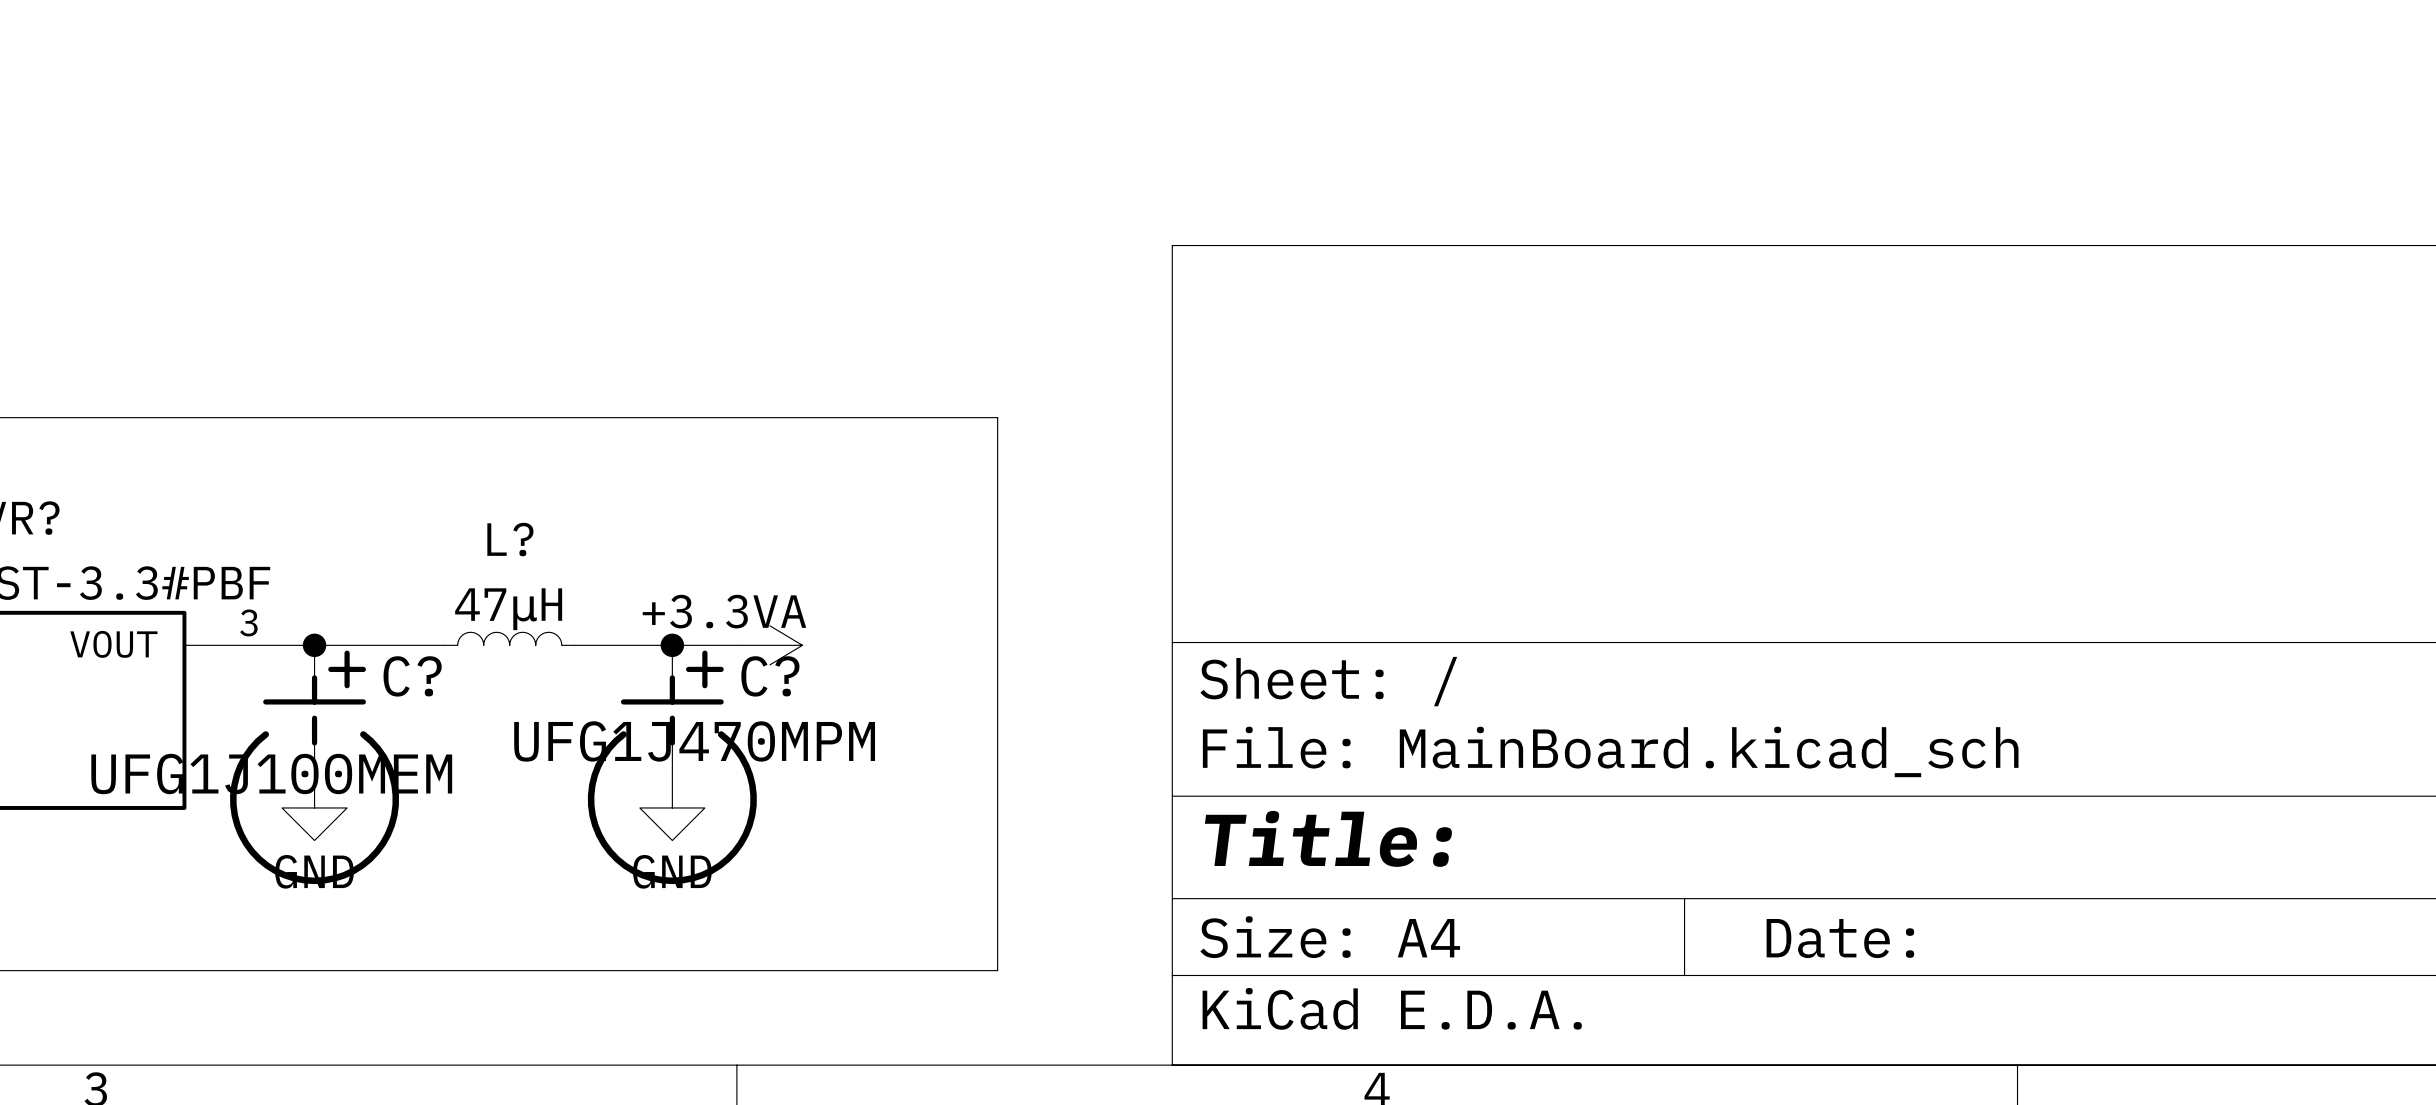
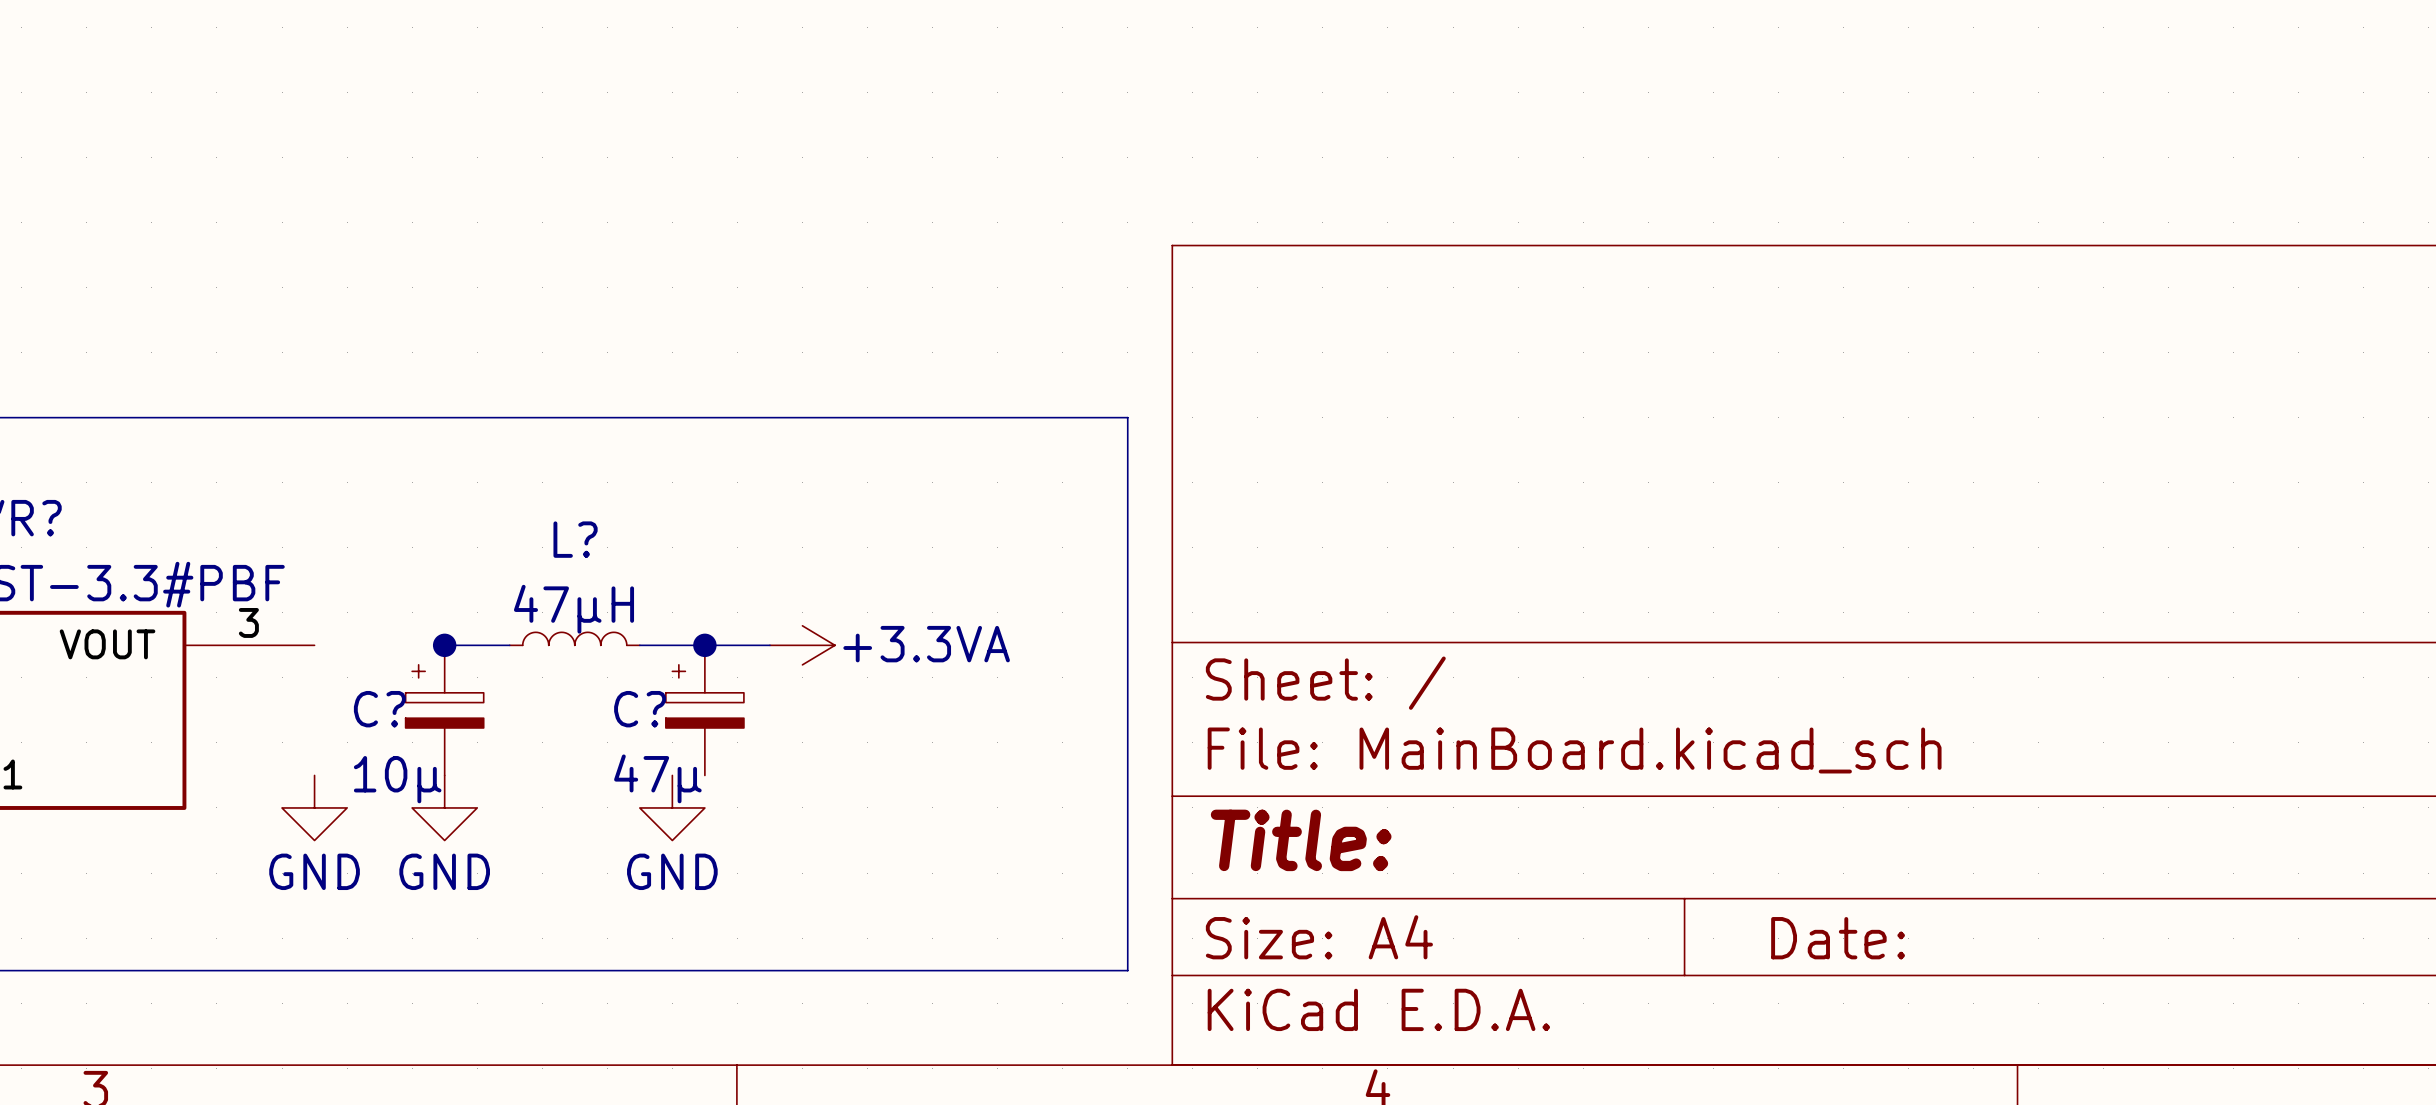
line: (997, 417) (997, 970) -> (997, 417) (1127, 417) (1127, 970) (997, 970)
power symbol text position: +3.3VA (724, 611) -> +3.3VA (926, 644)
L? position: (509, 638) -> (574, 638)
wire: (314, 645) (444, 645) -> (509, 645) (444, 645)
junction: (314, 645) -> none
junction: none -> (444, 645)
wire: (574, 645) (639, 645) -> none
junction position: (672, 645) -> (704, 645)
power symbol position: +3.3VA (769, 645) -> +3.3VA (802, 645)
C?: none -> 10μ (444, 710)
C?: none -> 47μ (704, 710)
C?: UFG1J100MEM (314, 764) -> none
C?: UFG1J470MPM (672, 764) -> none
power symbol: none -> GND (444, 807)

